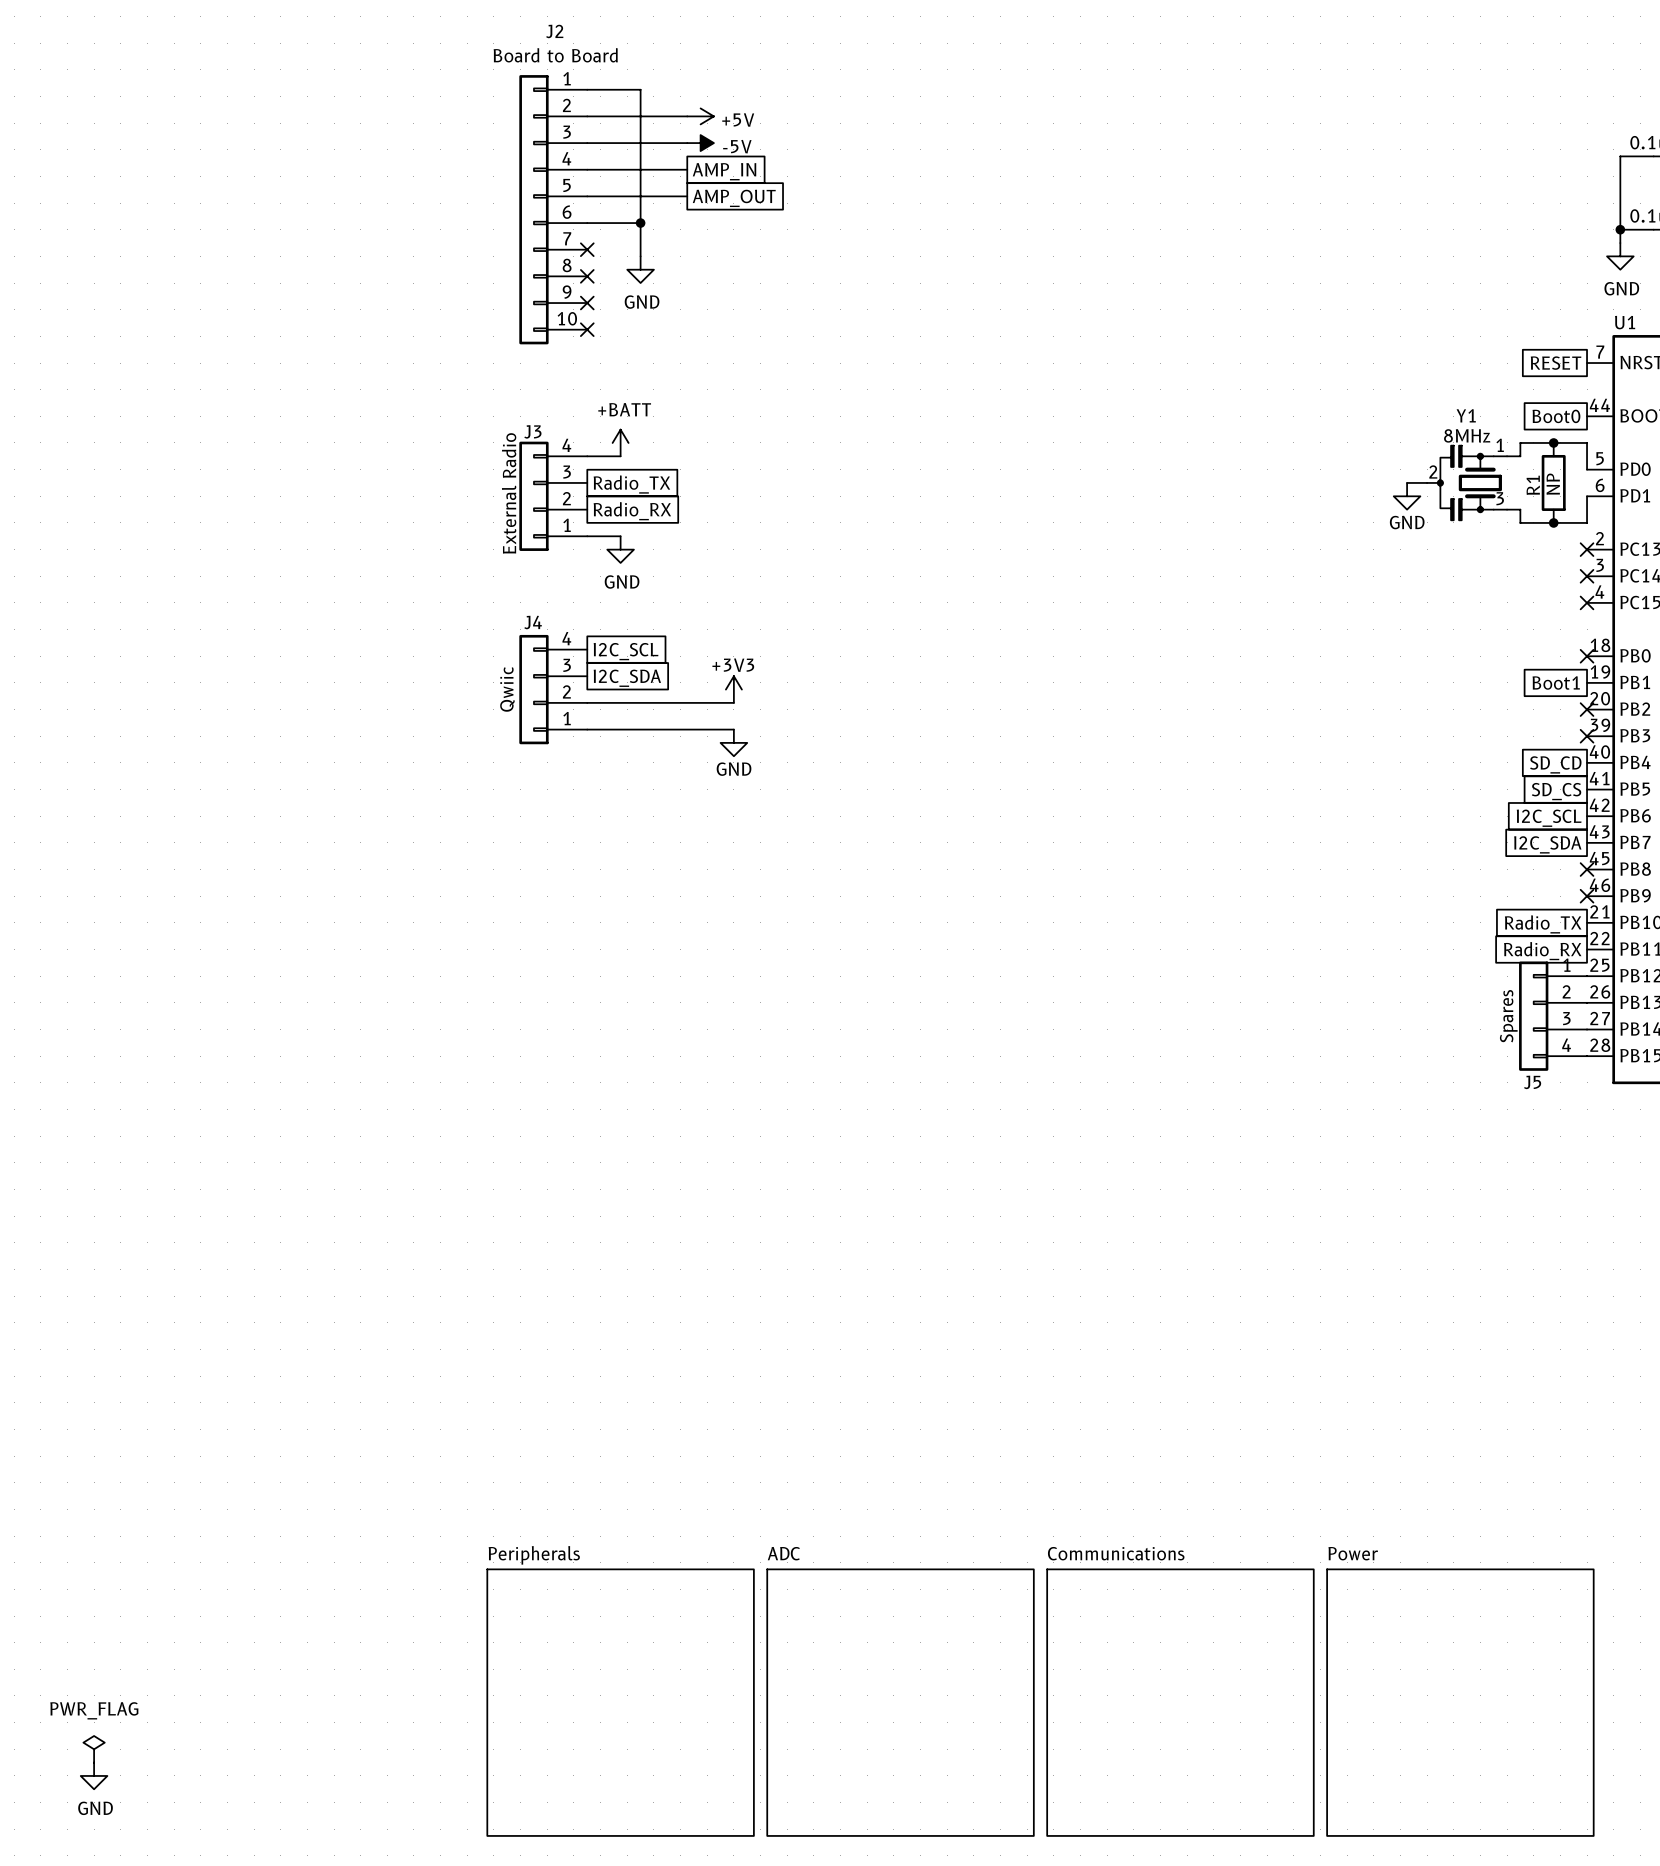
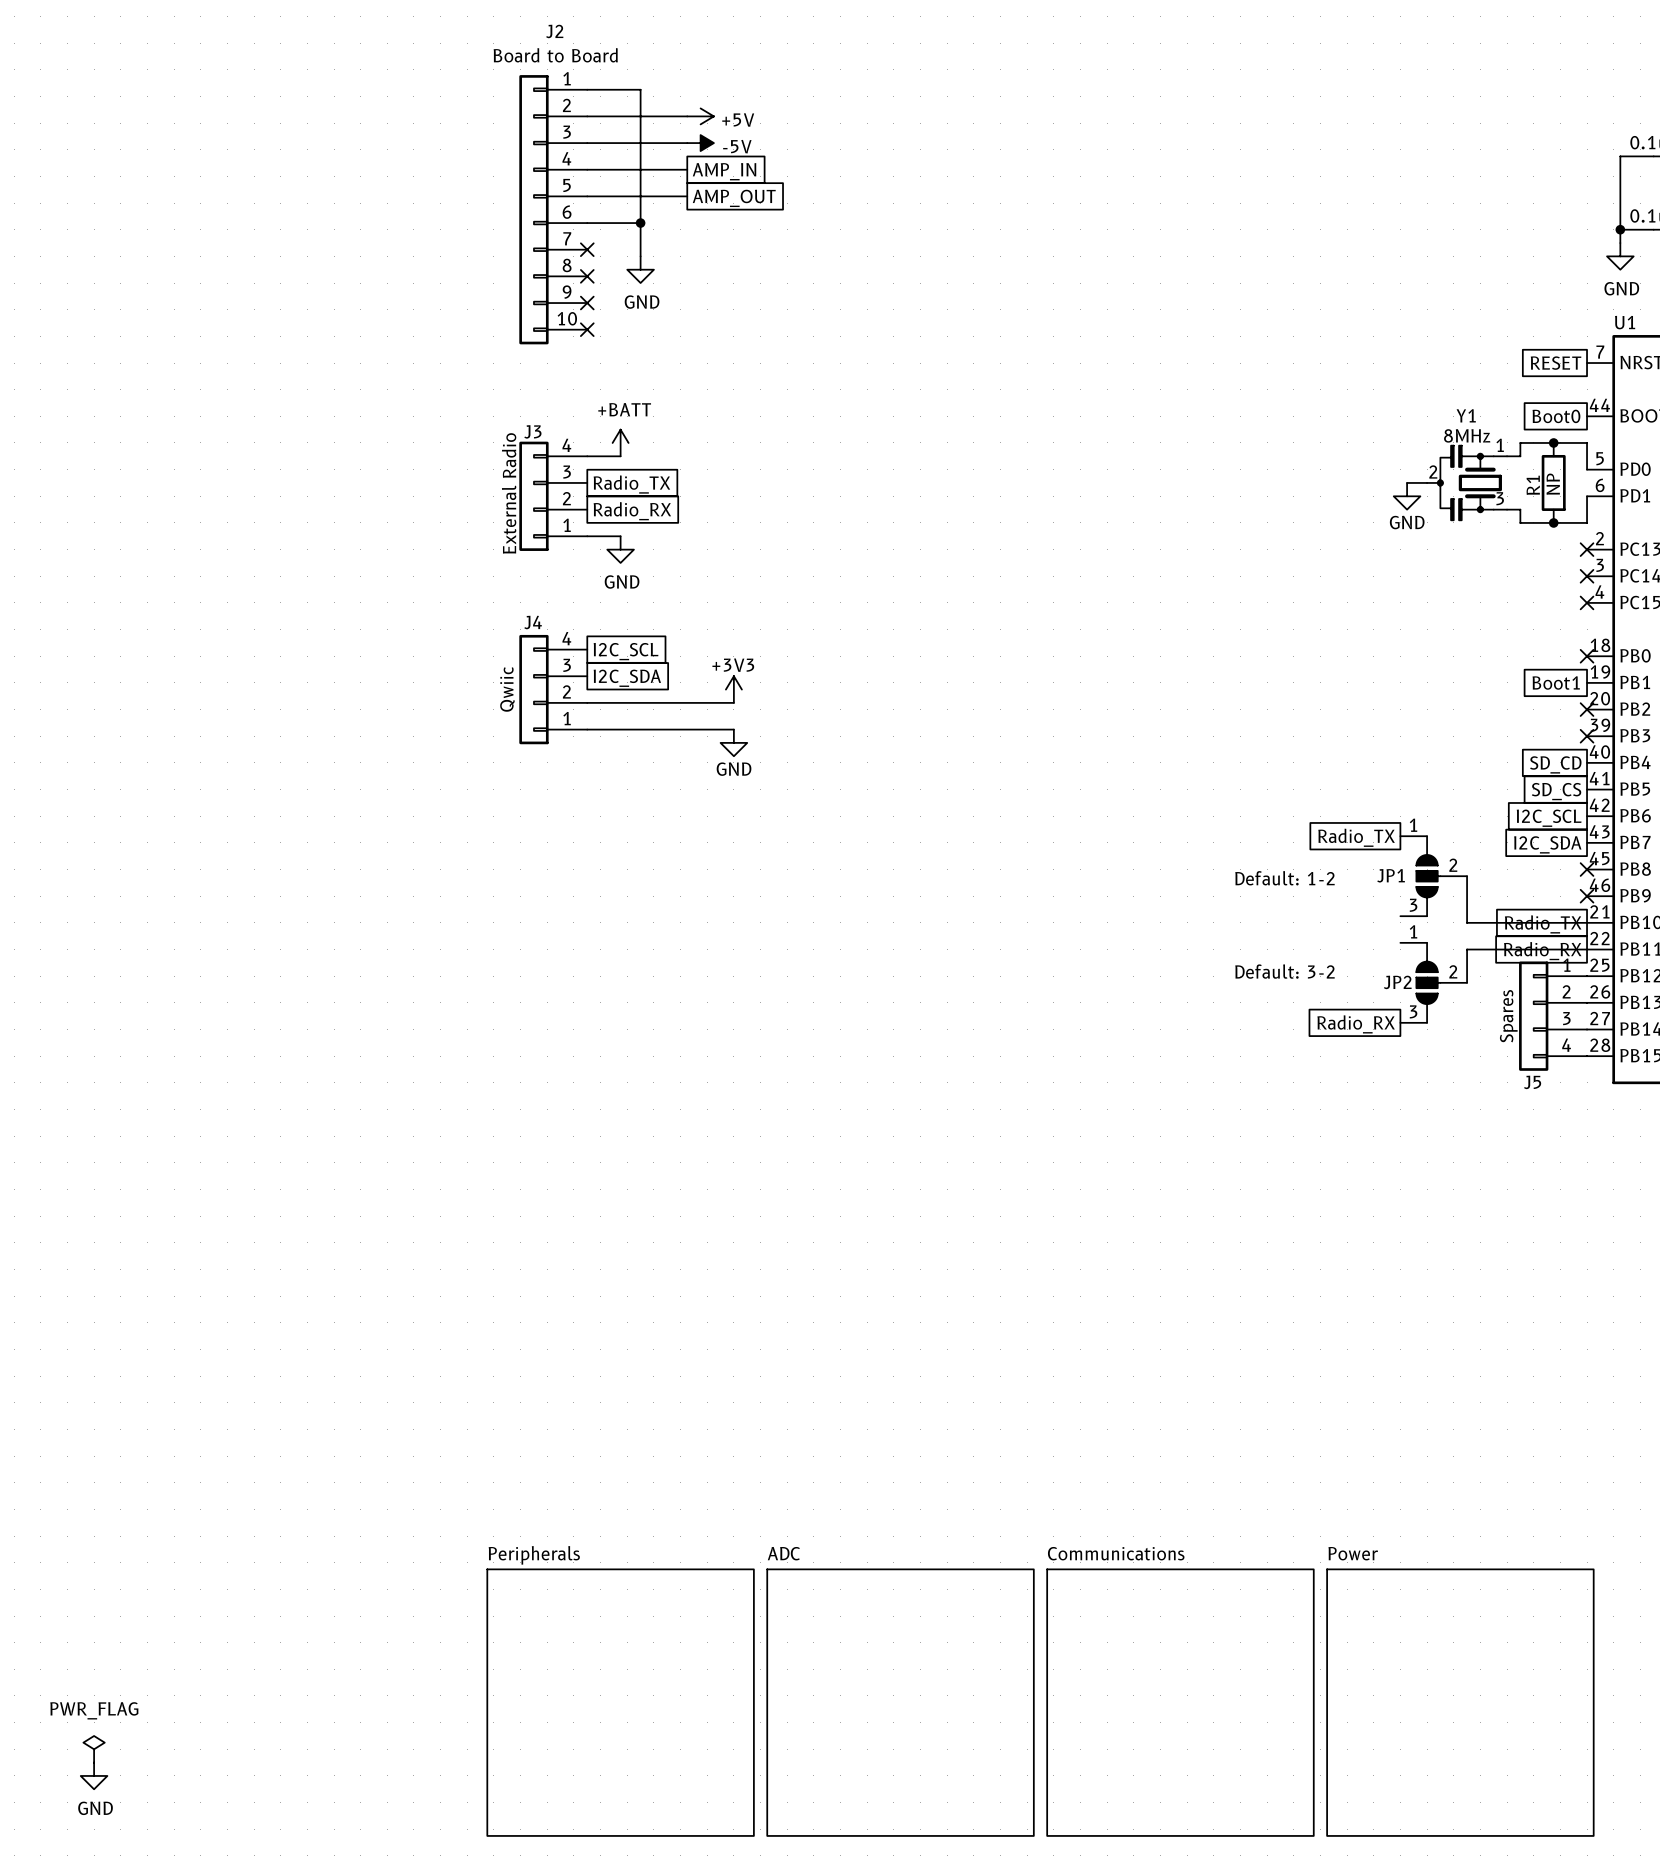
global label: none -> Radio_TX (1356, 837)
JP1: none -> (1433, 876)
wire: none -> (1467, 876) (1467, 922) (1587, 922)
text: none -> Default: 1-2 (1284, 878)
wire: none -> (1587, 949) (1467, 949) (1467, 982)
text: none -> Default: 3-2 (1284, 971)
JP2: none -> (1433, 982)
global label: none -> Radio_RX (1356, 1024)

